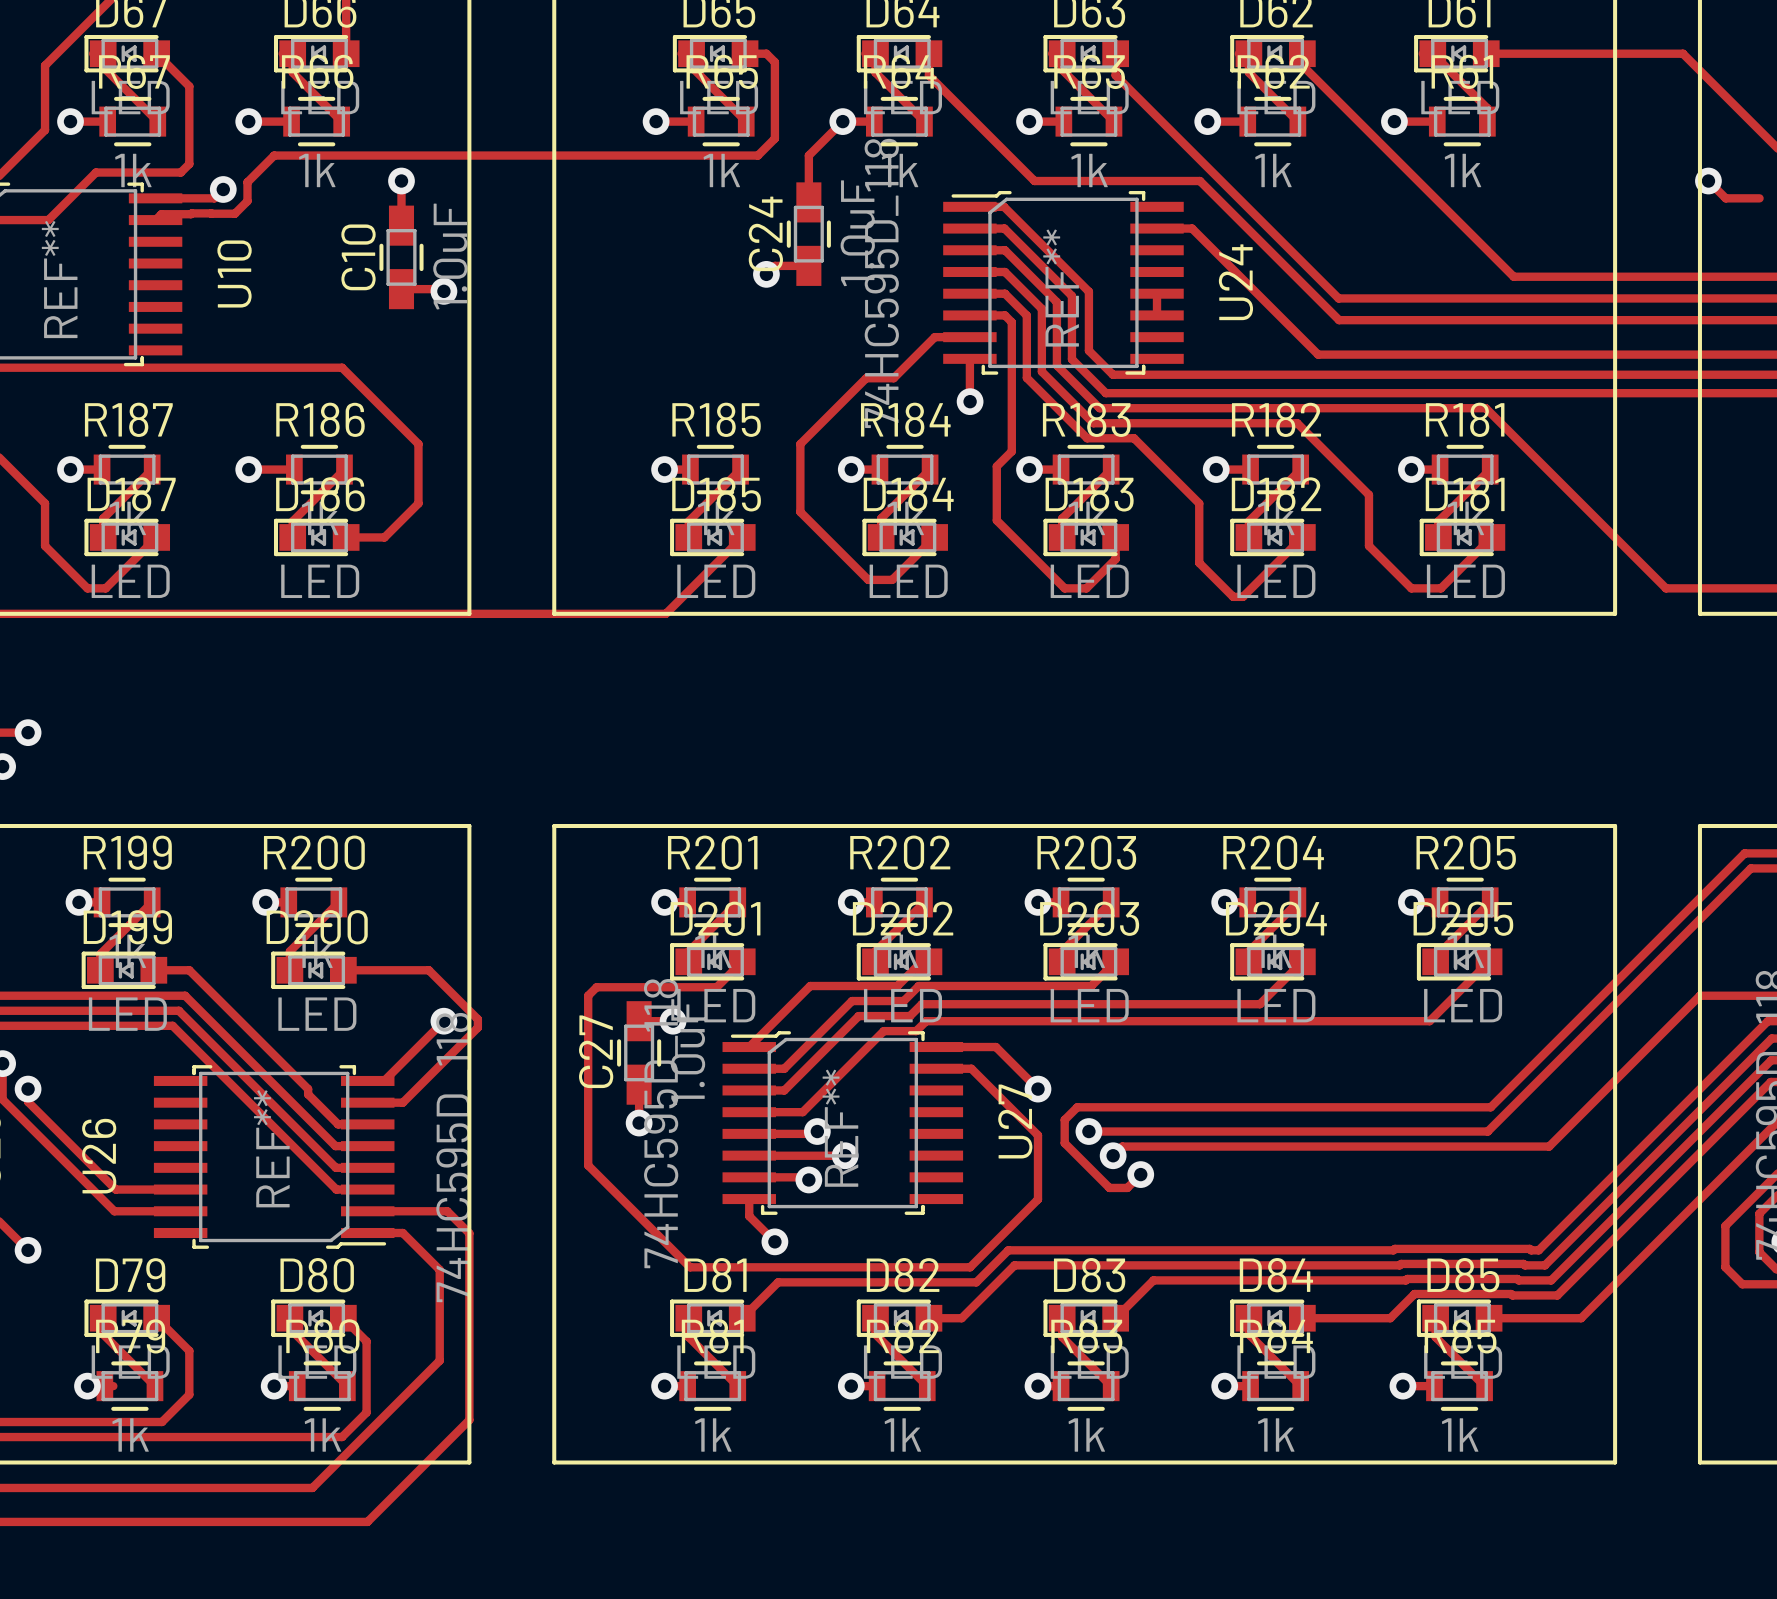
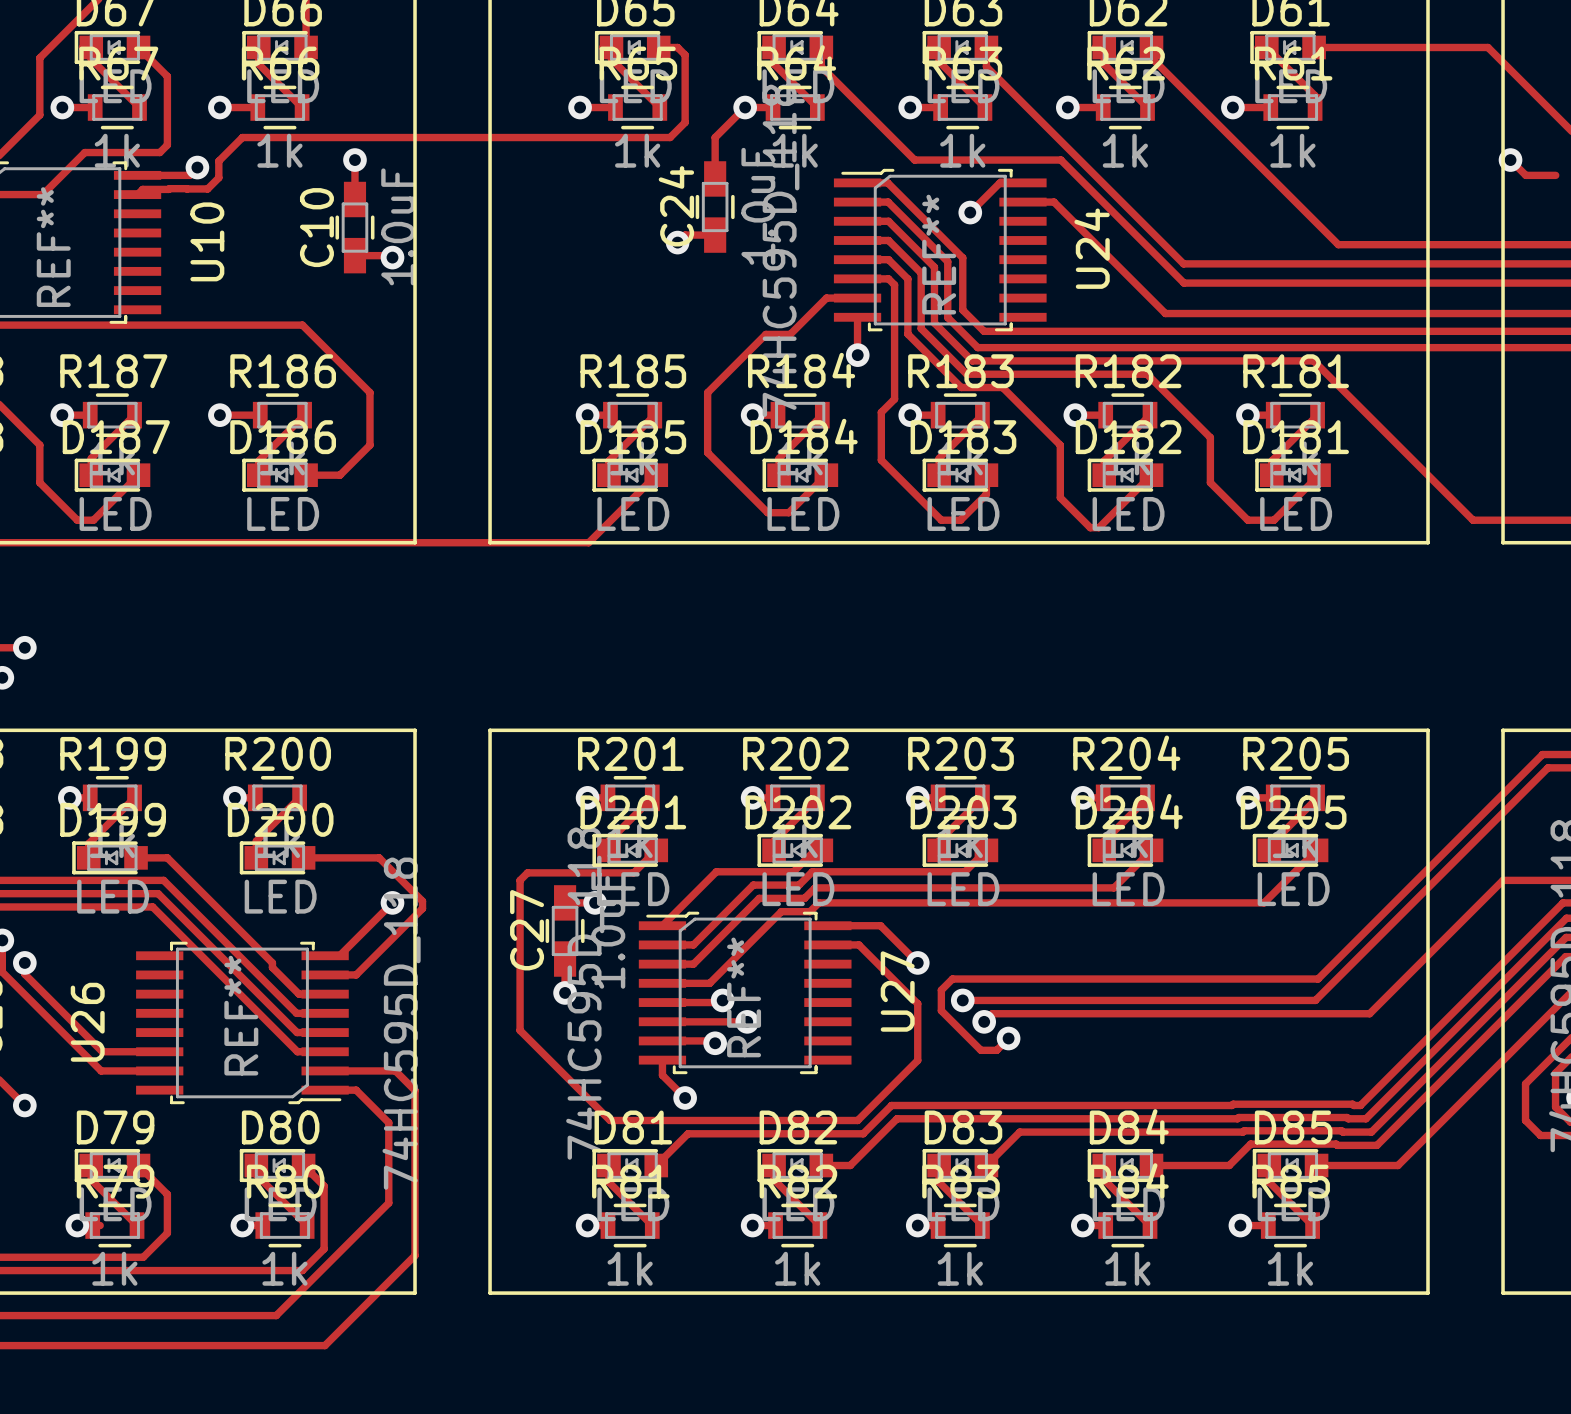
track: none -> (1022, 182) (999, 182) (970, 212)
via: none -> (970, 212)
track: (1157, 293) (1157, 315) -> none

